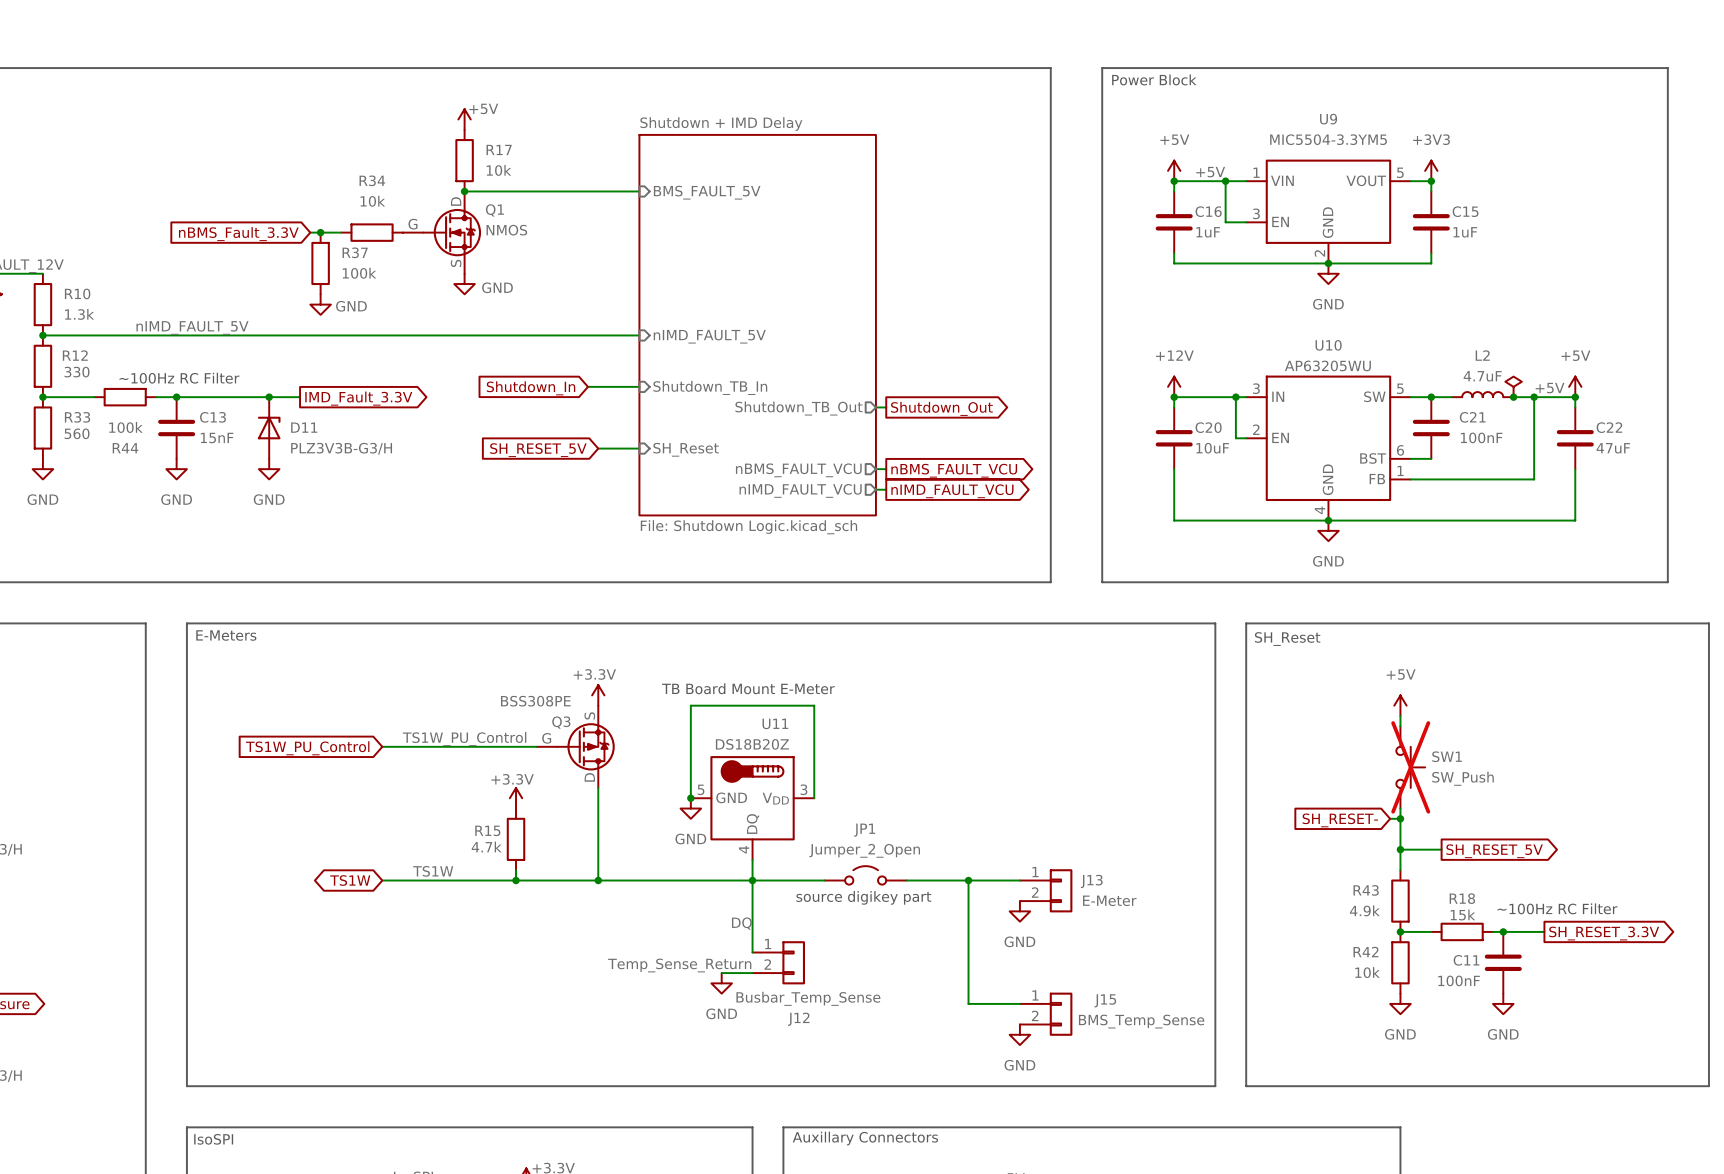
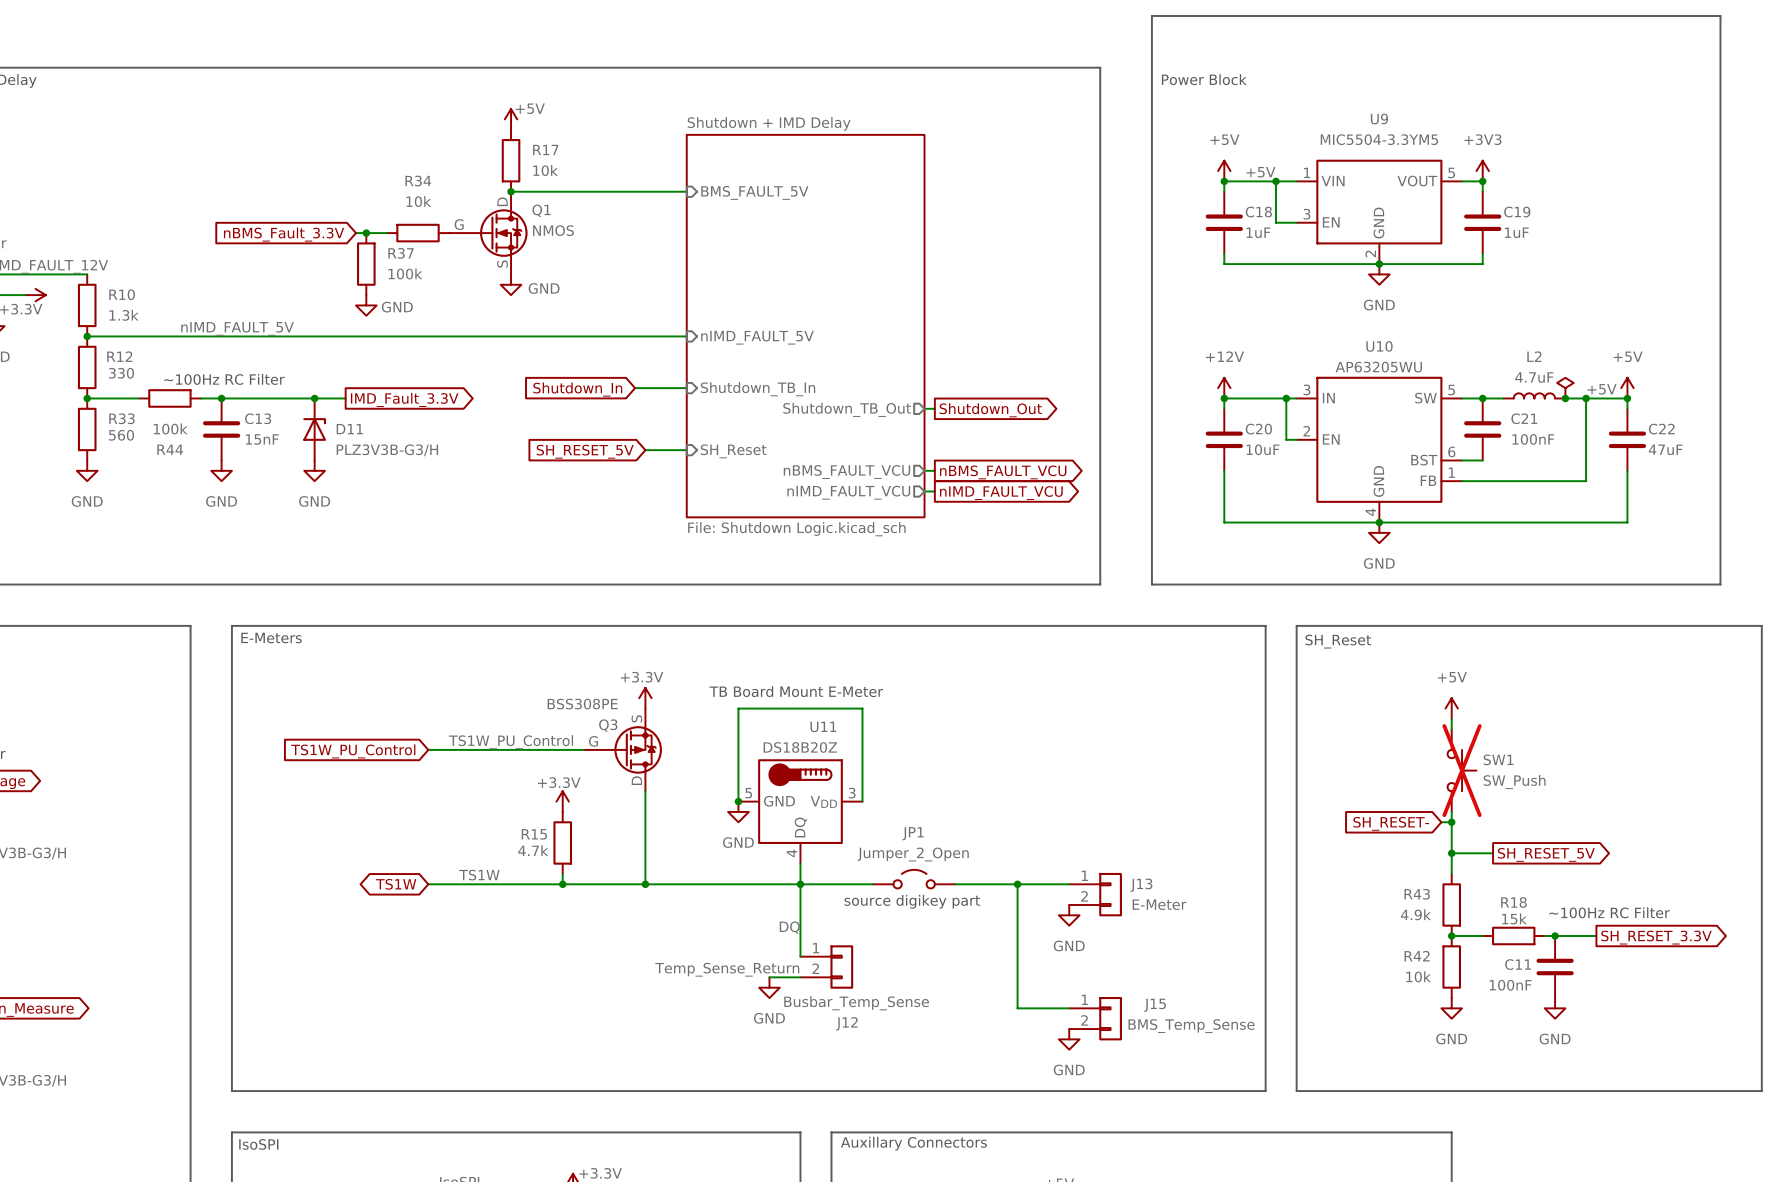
line: (1102, 68) (1667, 68) -> (1151, 67) (1151, 16) (1720, 16) (1720, 67)
C16 name: C16 (1208, 211) -> C18 (1258, 212)
C15 name: C15 (1465, 211) -> C19 (1517, 212)

